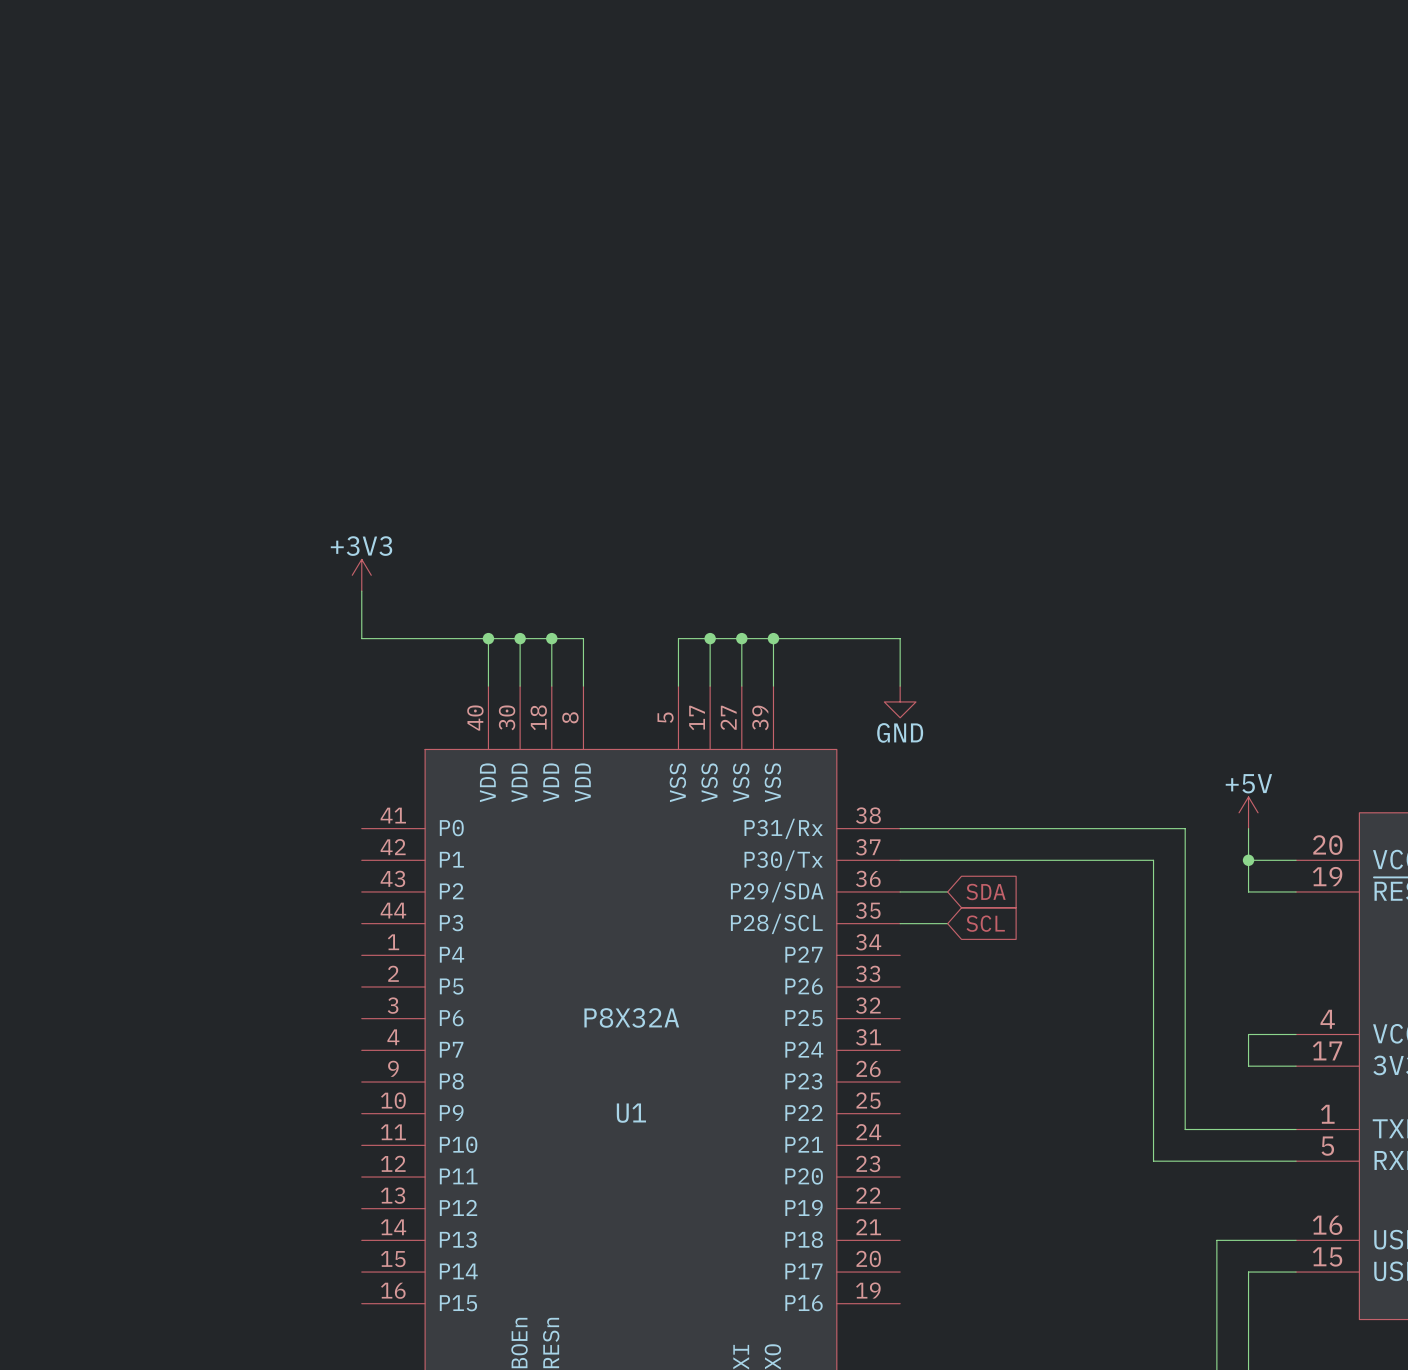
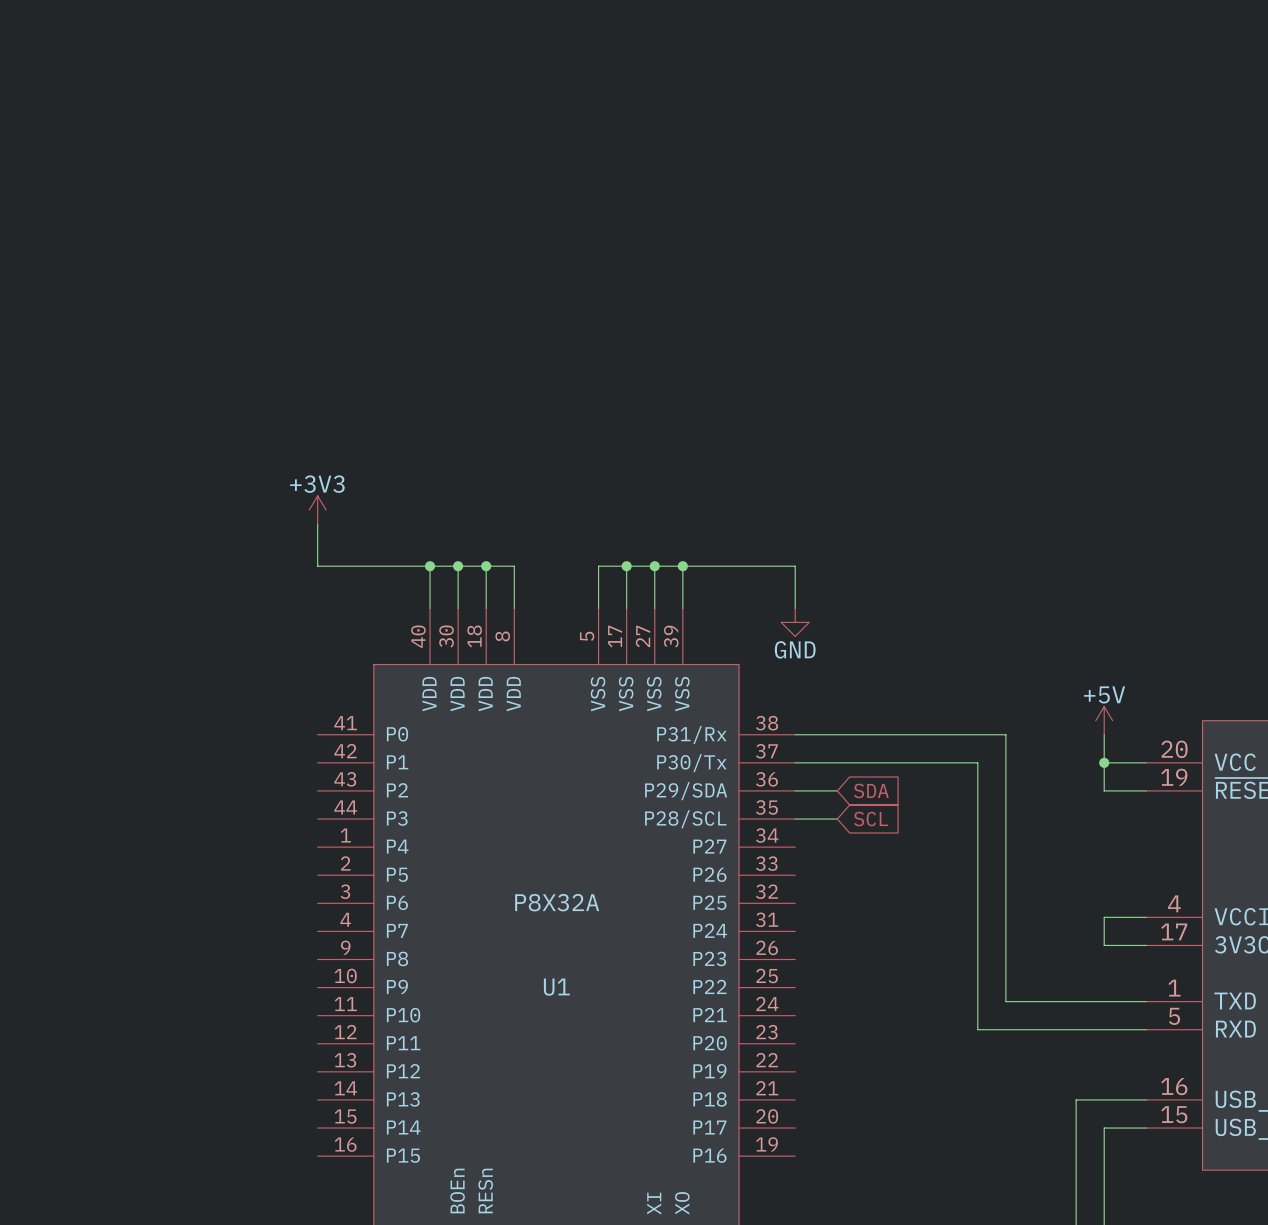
wire: (1137, 828) (1185, 828) (1185, 1129) -> (1005, 734) (1005, 1001) (1048, 1001)
wire: (1106, 860) (1153, 860) (1153, 1161) -> (977, 762) (977, 1029) (1019, 1029)

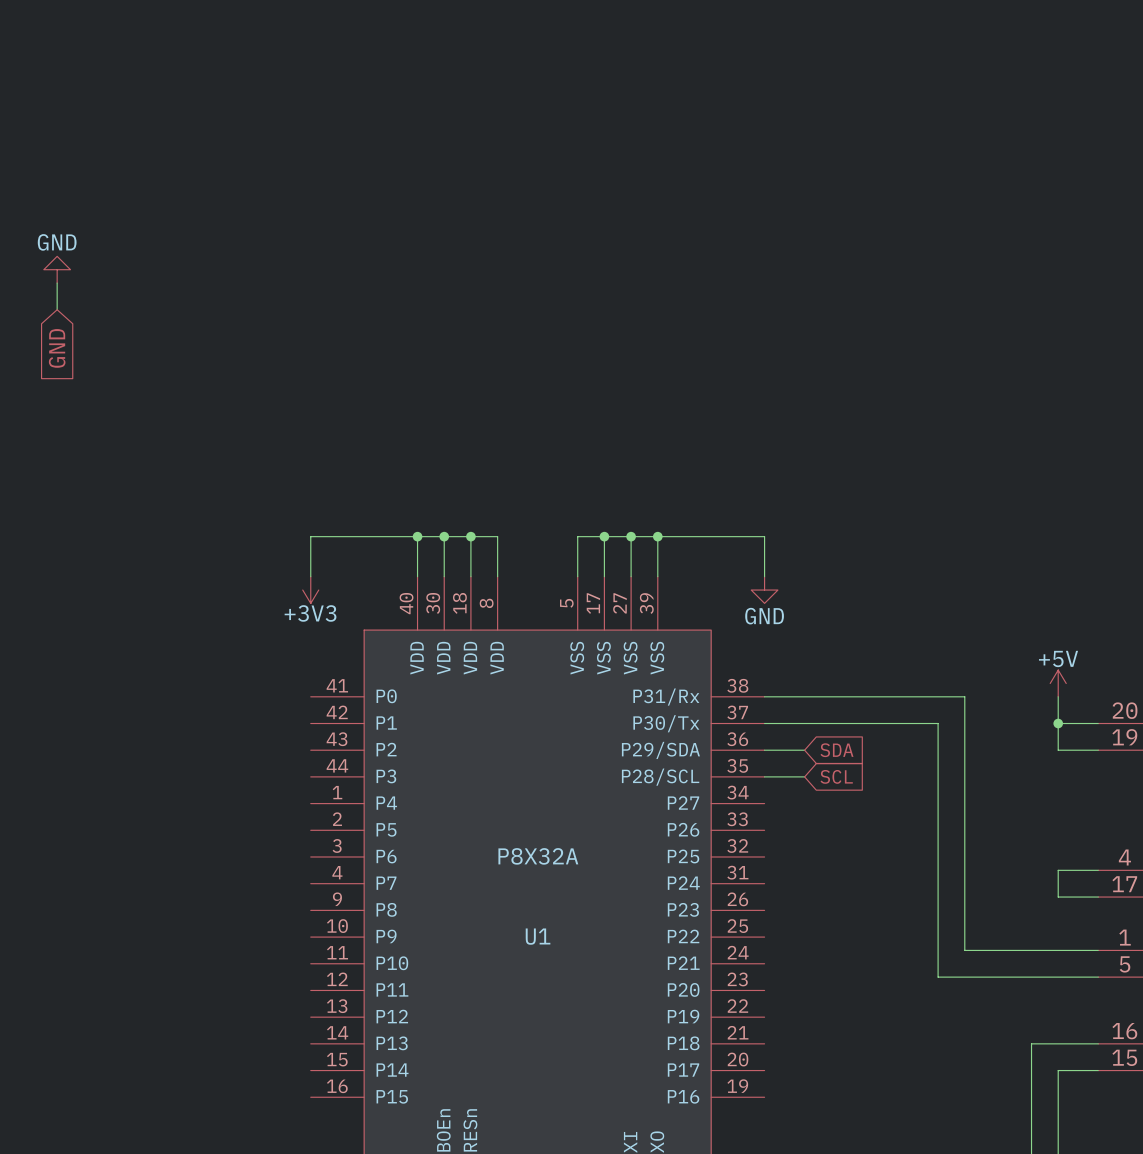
power symbol: none -> GND (57, 269)
wire: none -> (57, 283) (57, 309)
global label: none -> GND (57, 348)
power symbol rotation: 0° (317, 510) -> 180° (310, 590)
power symbol position: +3V3 (317, 510) -> +3V3 (310, 590)
wire: (317, 524) (317, 566) -> (310, 576) (310, 536)

